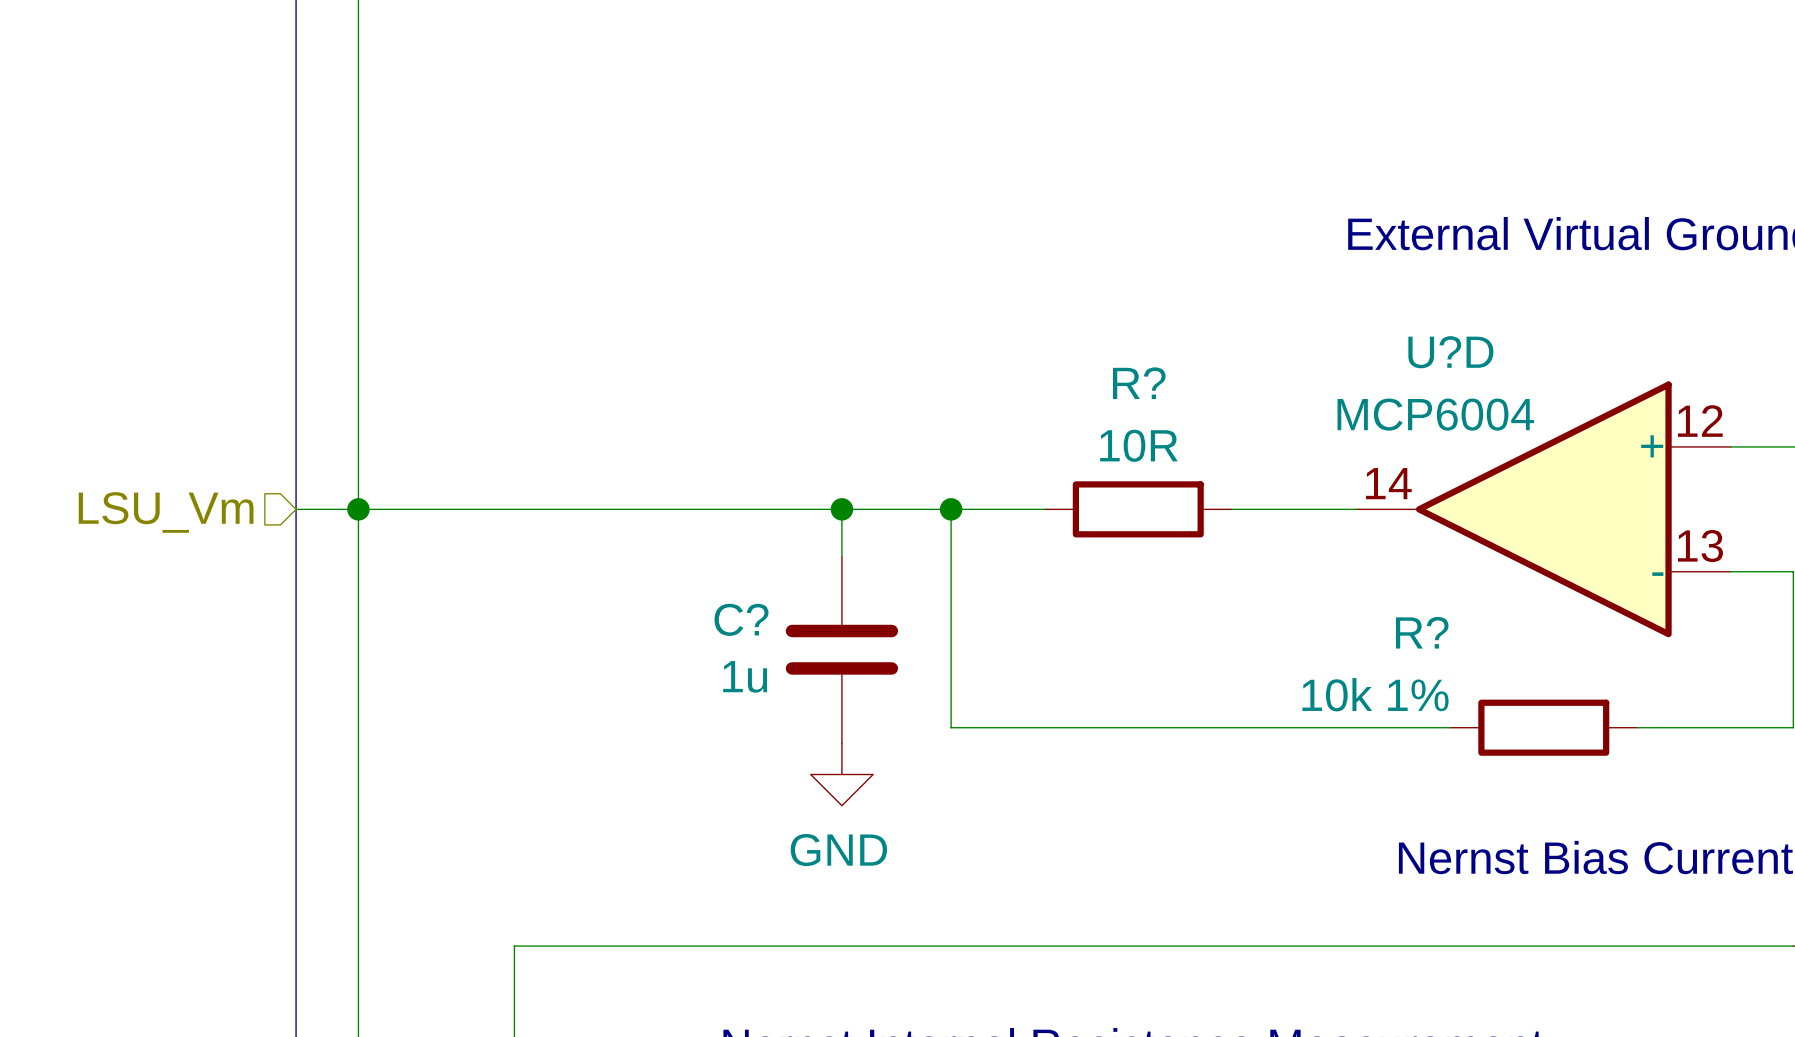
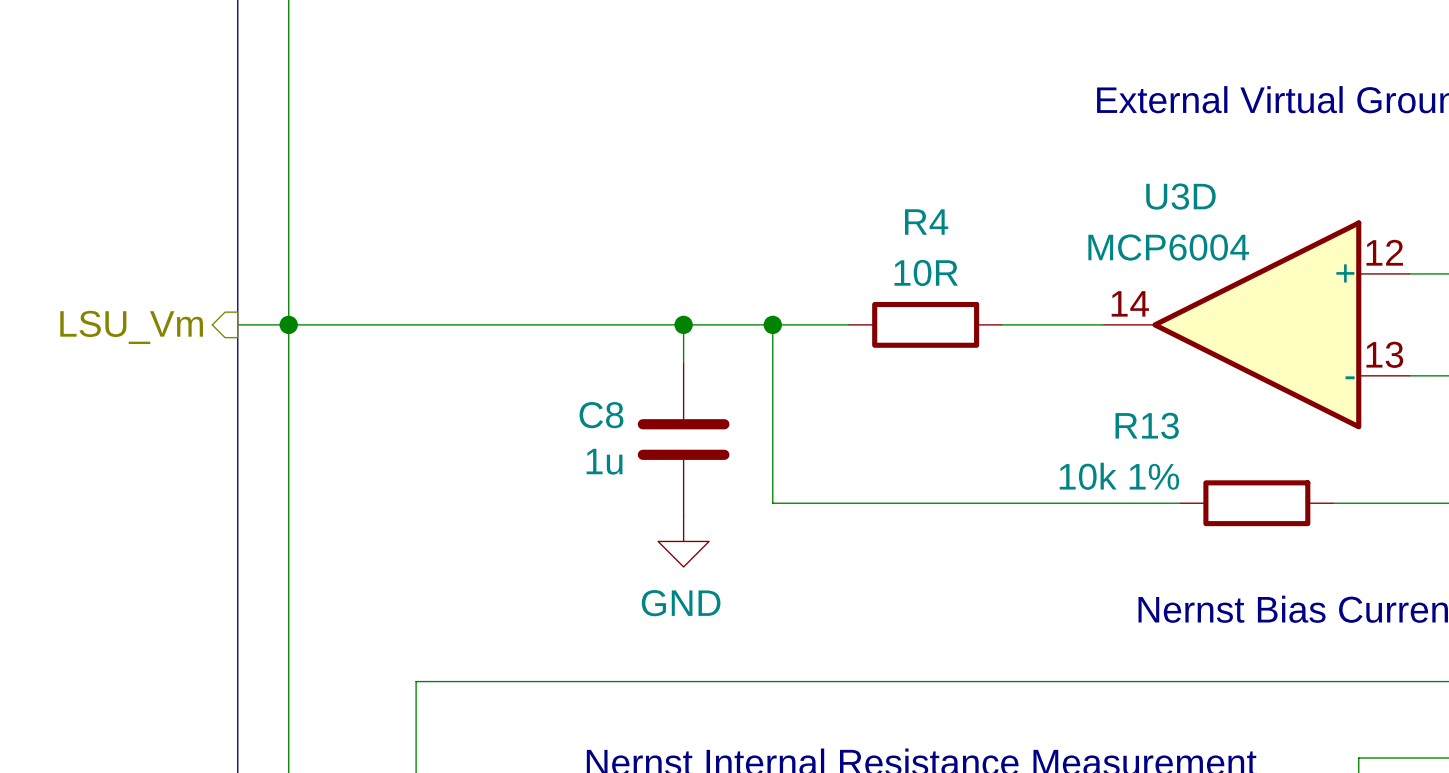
U?D name: U?D (1450, 352) -> U3D (1180, 196)
R? name: R? (1139, 383) -> R4 (926, 222)
hierarchical label shape: input (166, 512) -> output (131, 327)
C? name: C? (741, 619) -> C8 (601, 415)
R? name: R? (1422, 632) -> R13 (1147, 425)

